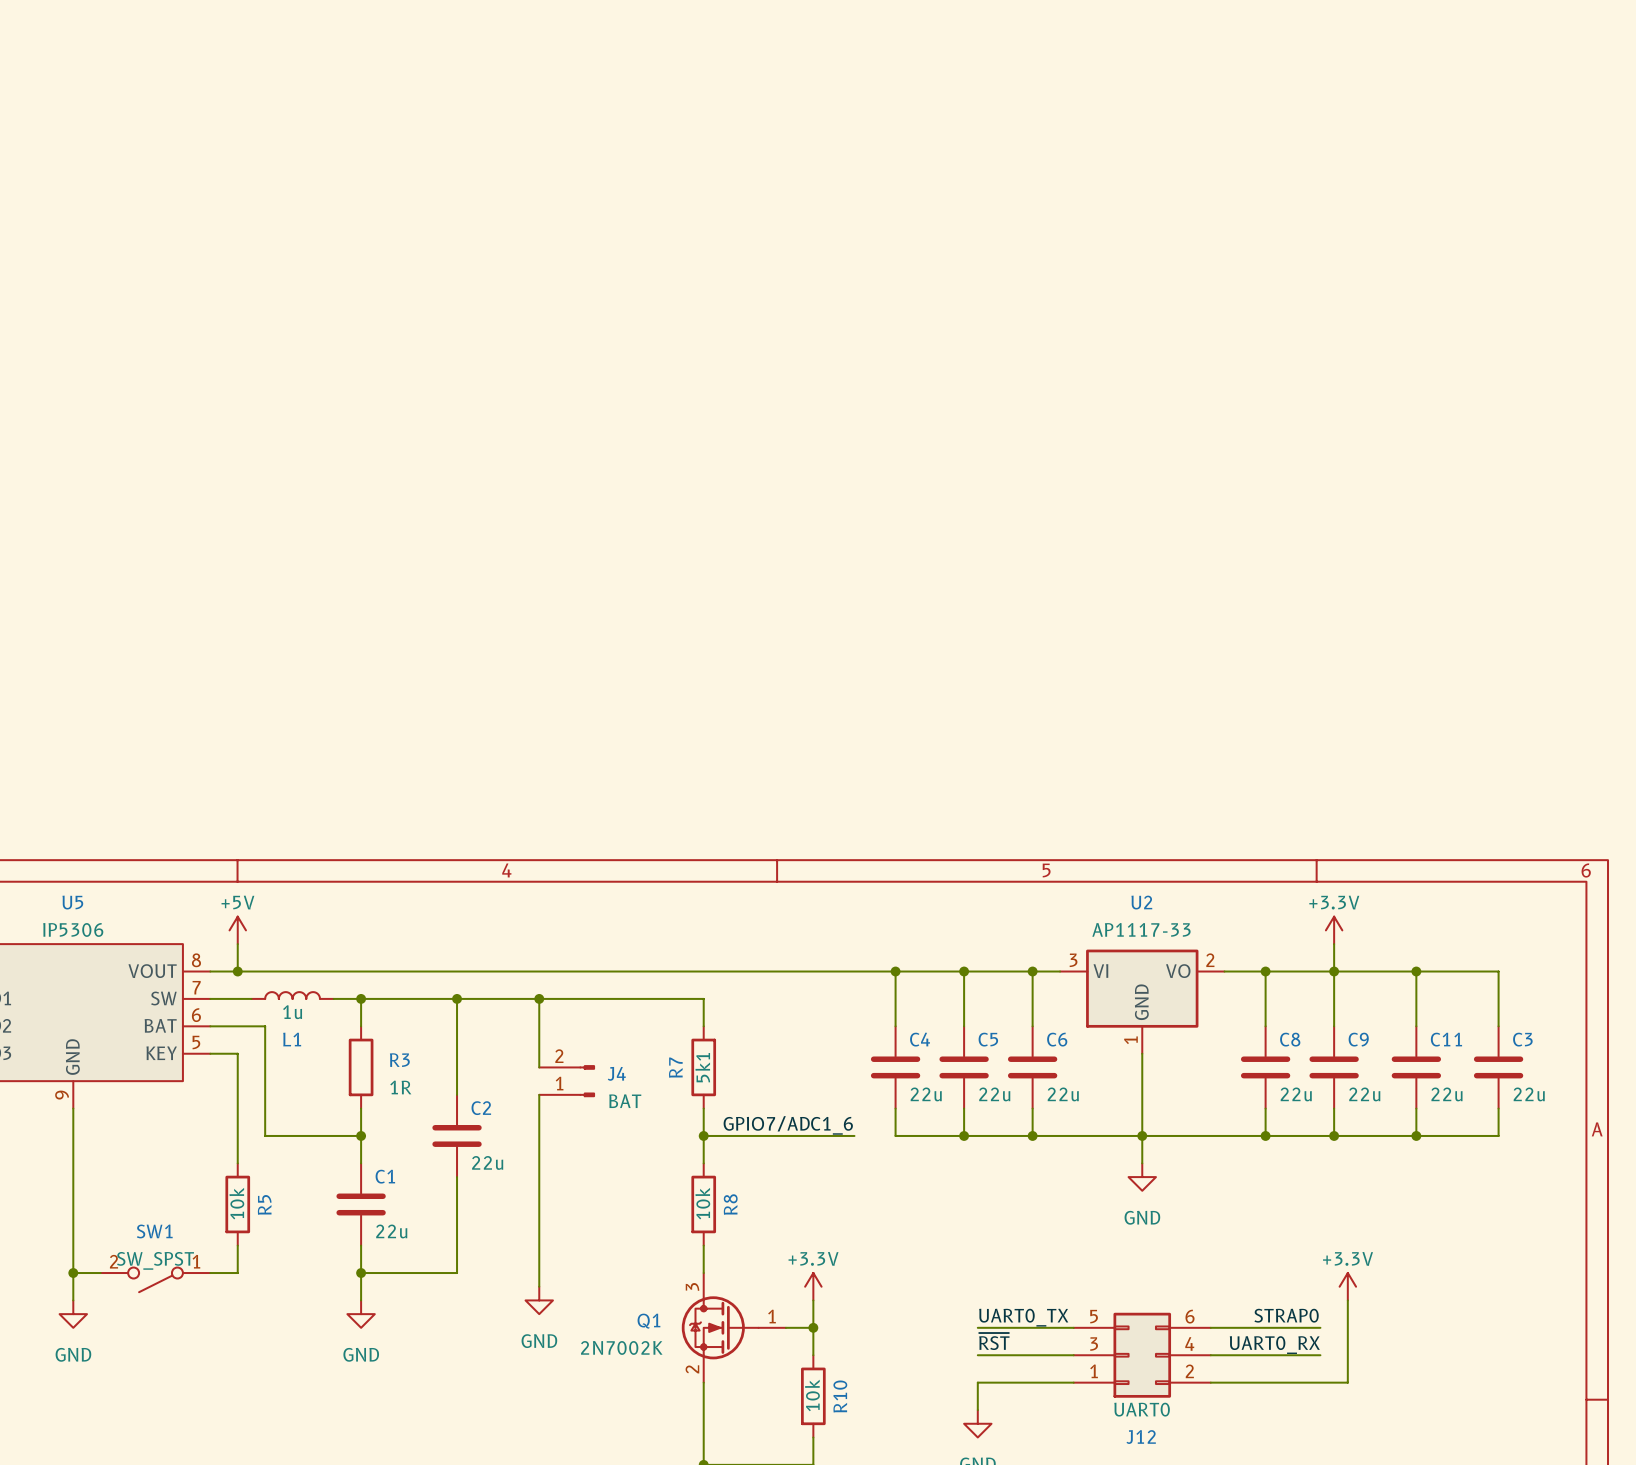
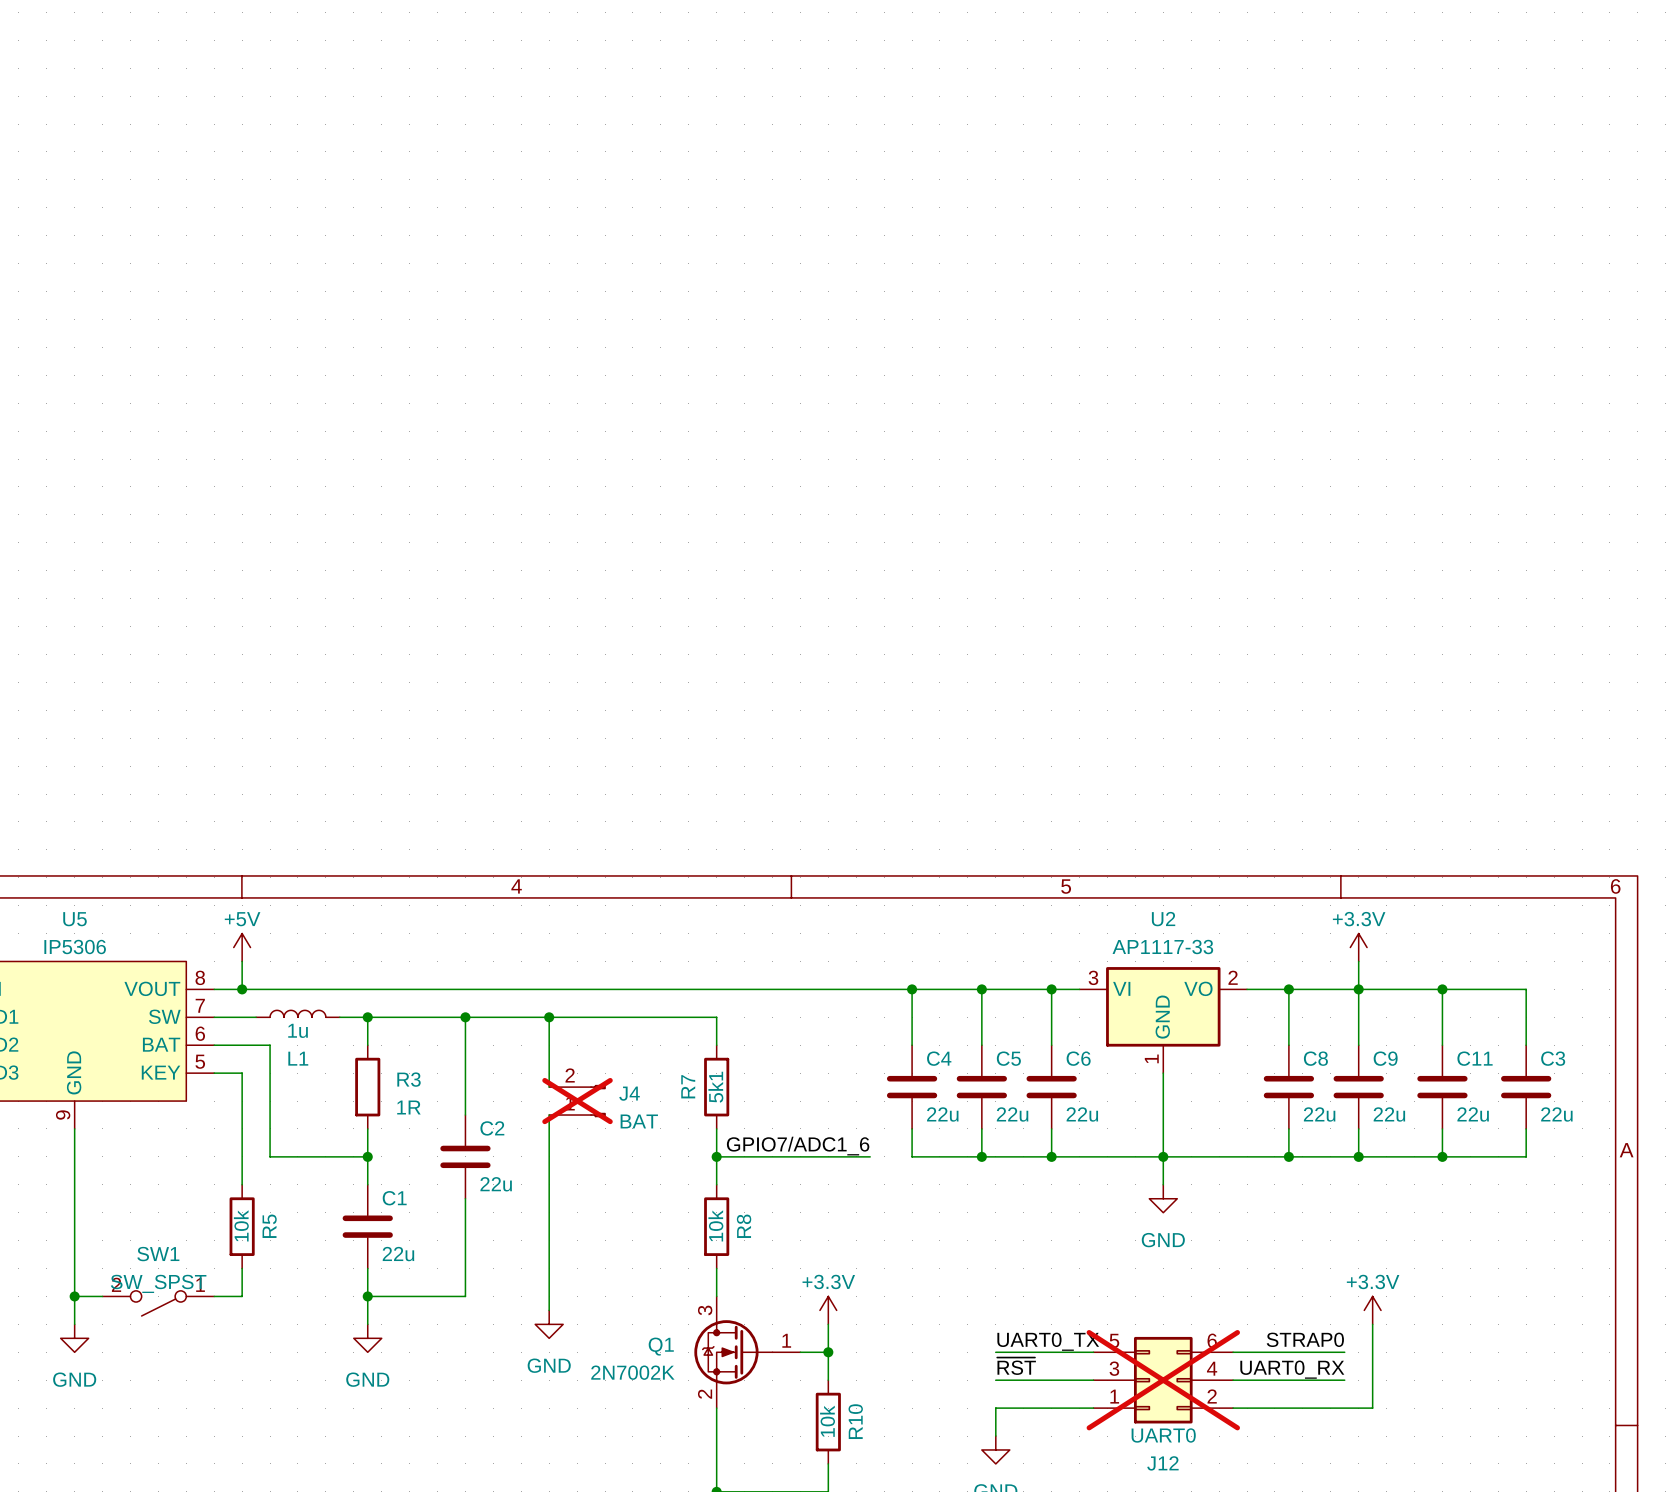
J4 do-not-place cross: none -> (577, 1101)
J12 do-not-place cross: none -> (1163, 1380)

